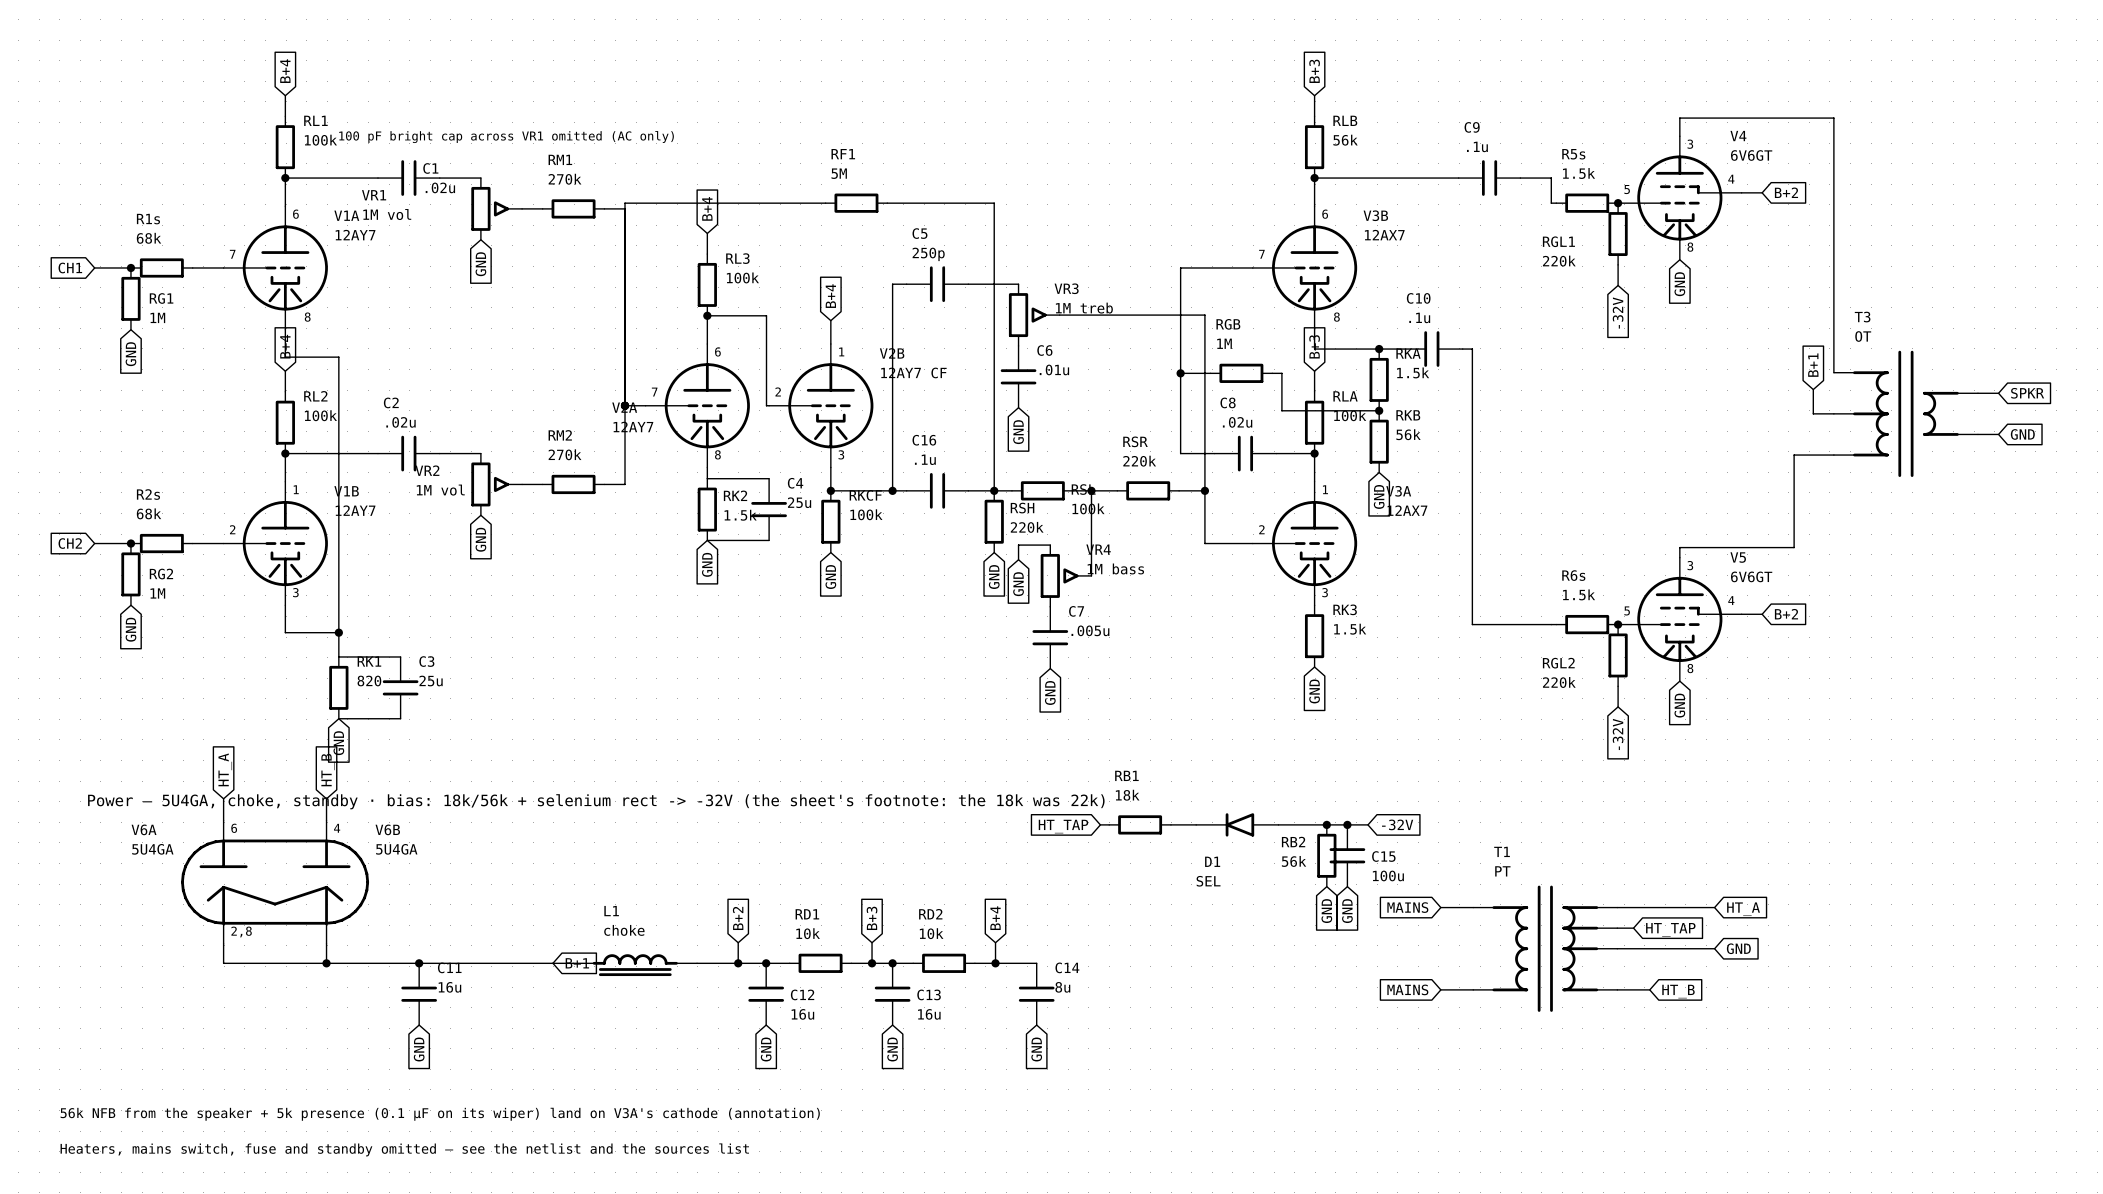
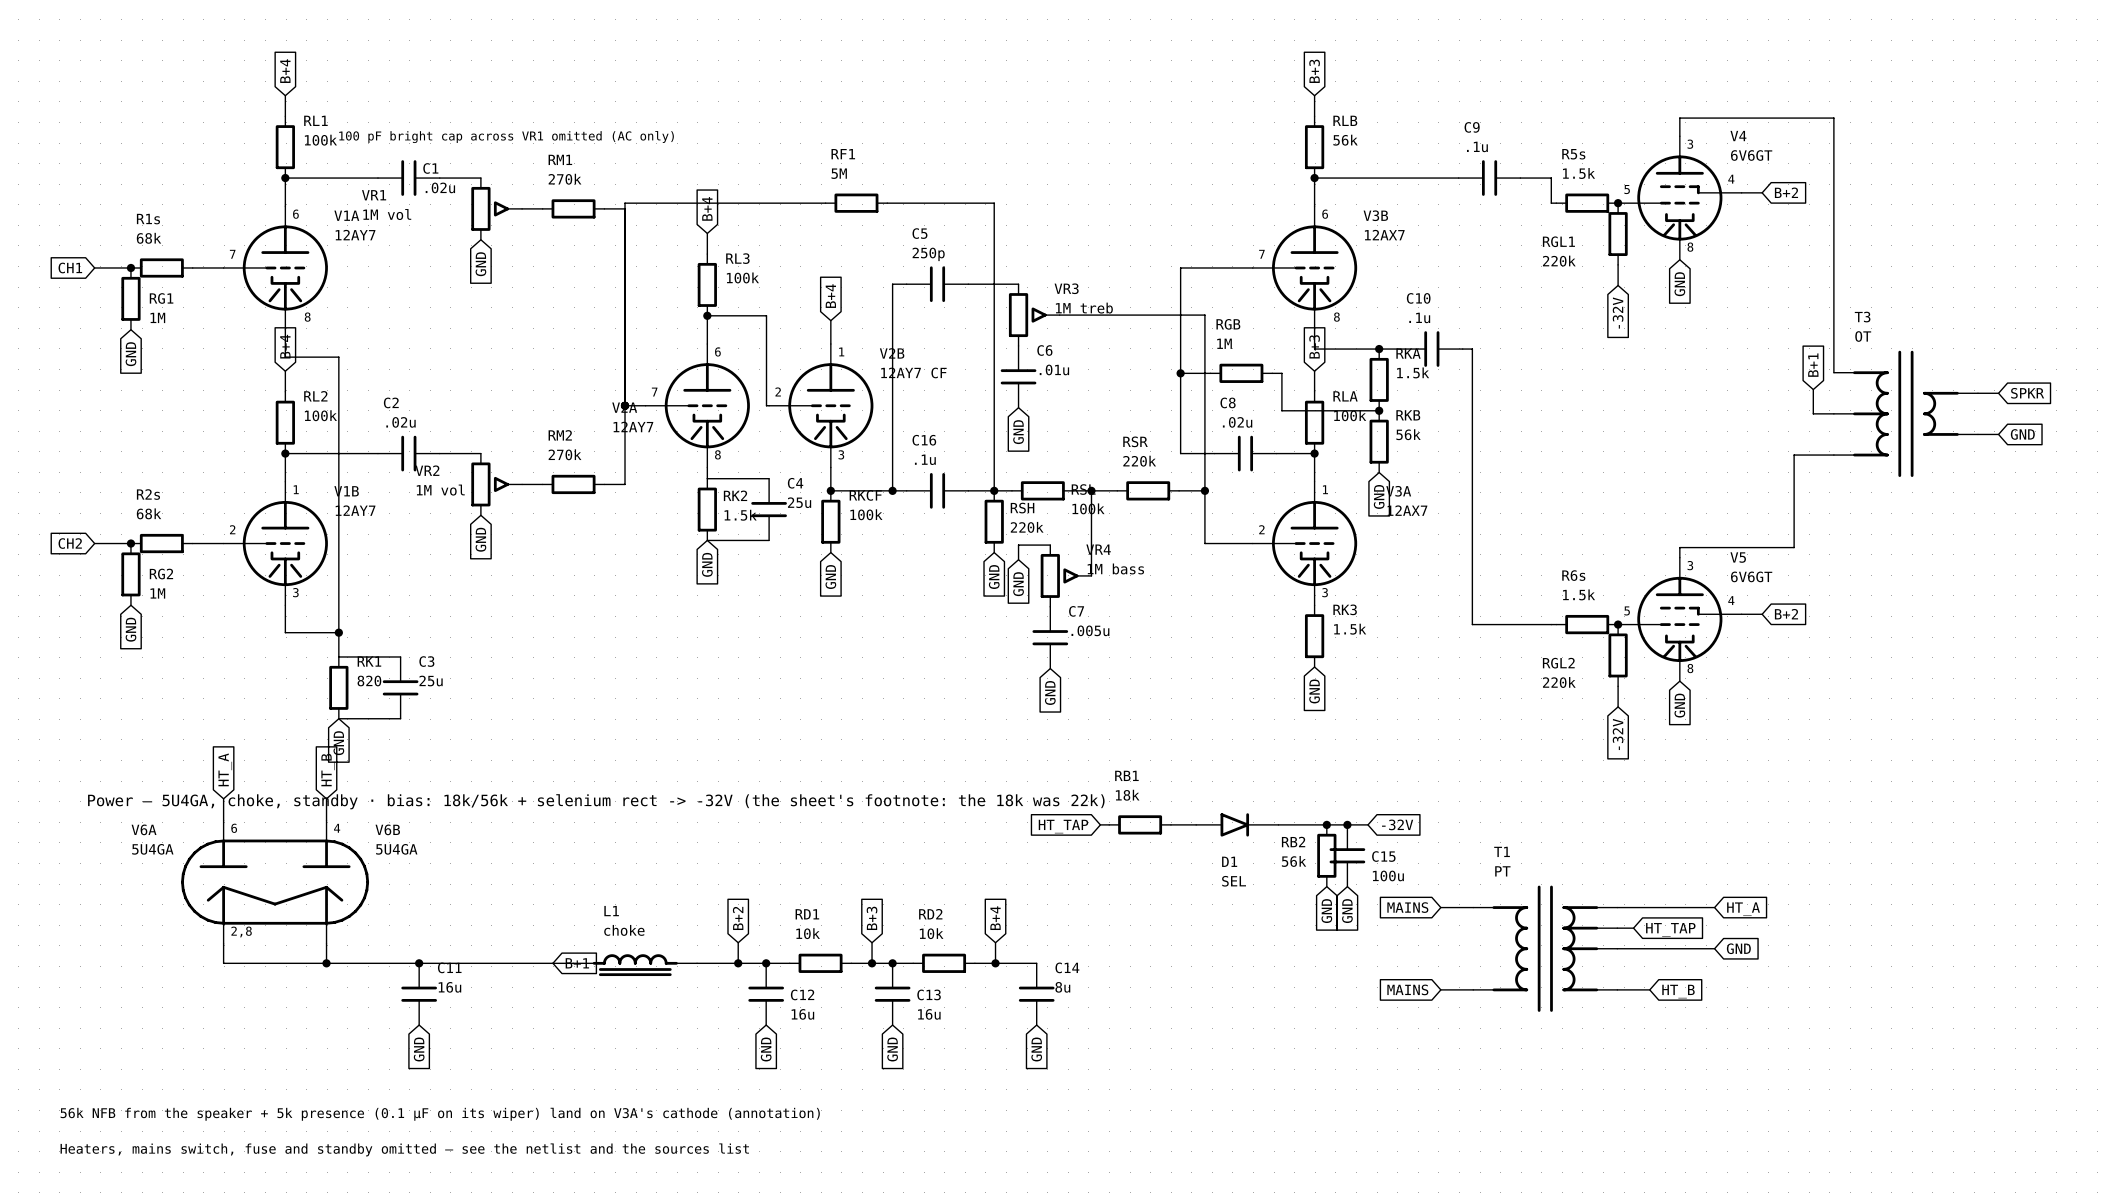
D1 rotation: 0° (1239, 824) -> 180° (1234, 824)
D1 name position: D1 (1212, 861) -> D1 (1229, 861)
D1 value position: SEL (1208, 881) -> SEL (1234, 881)

